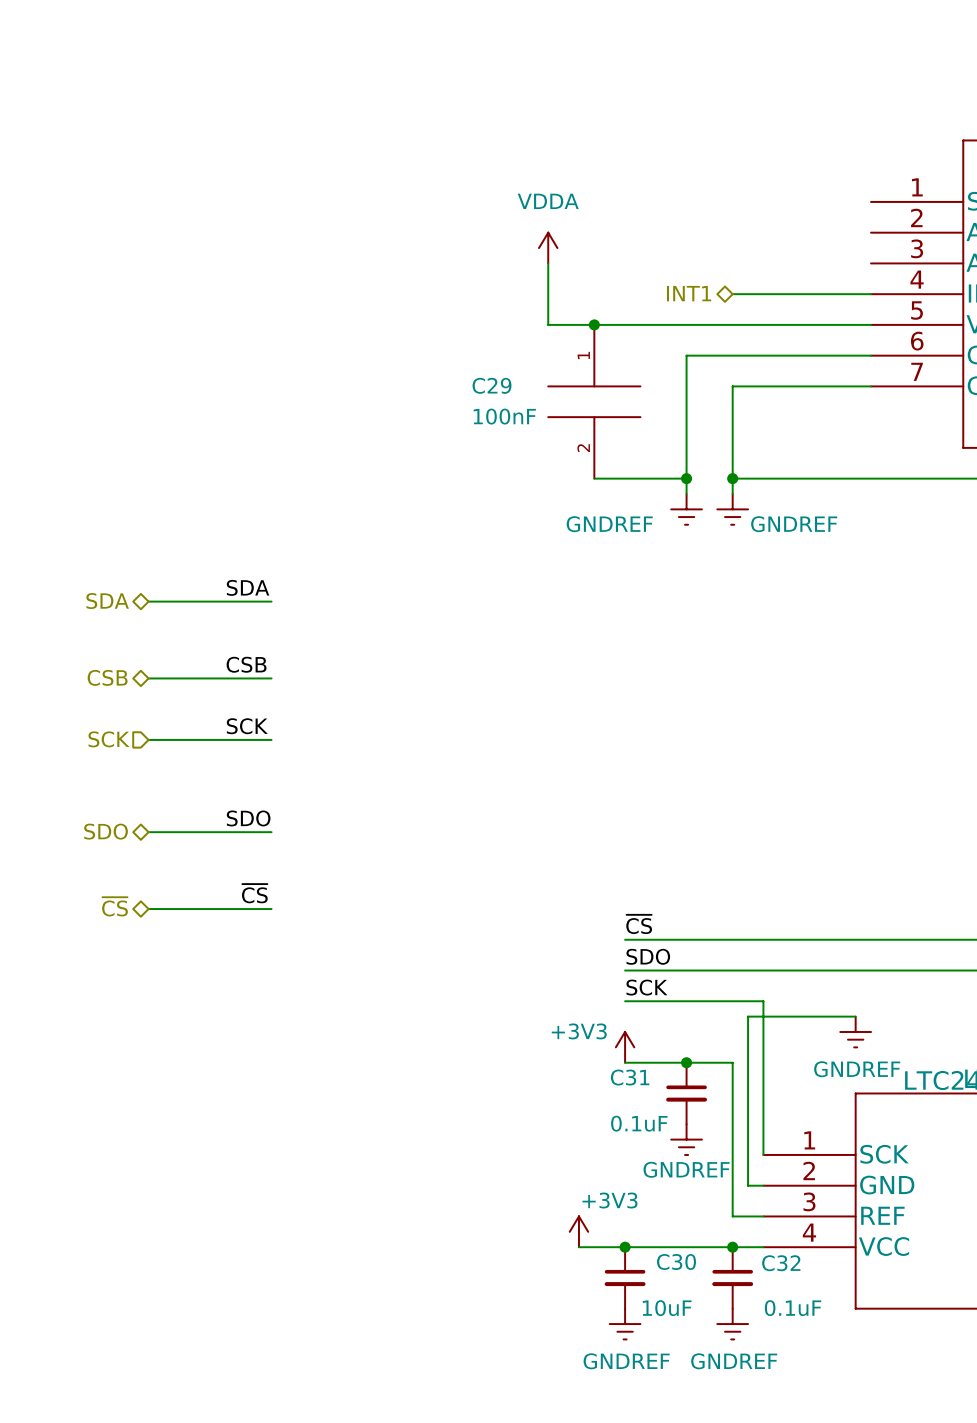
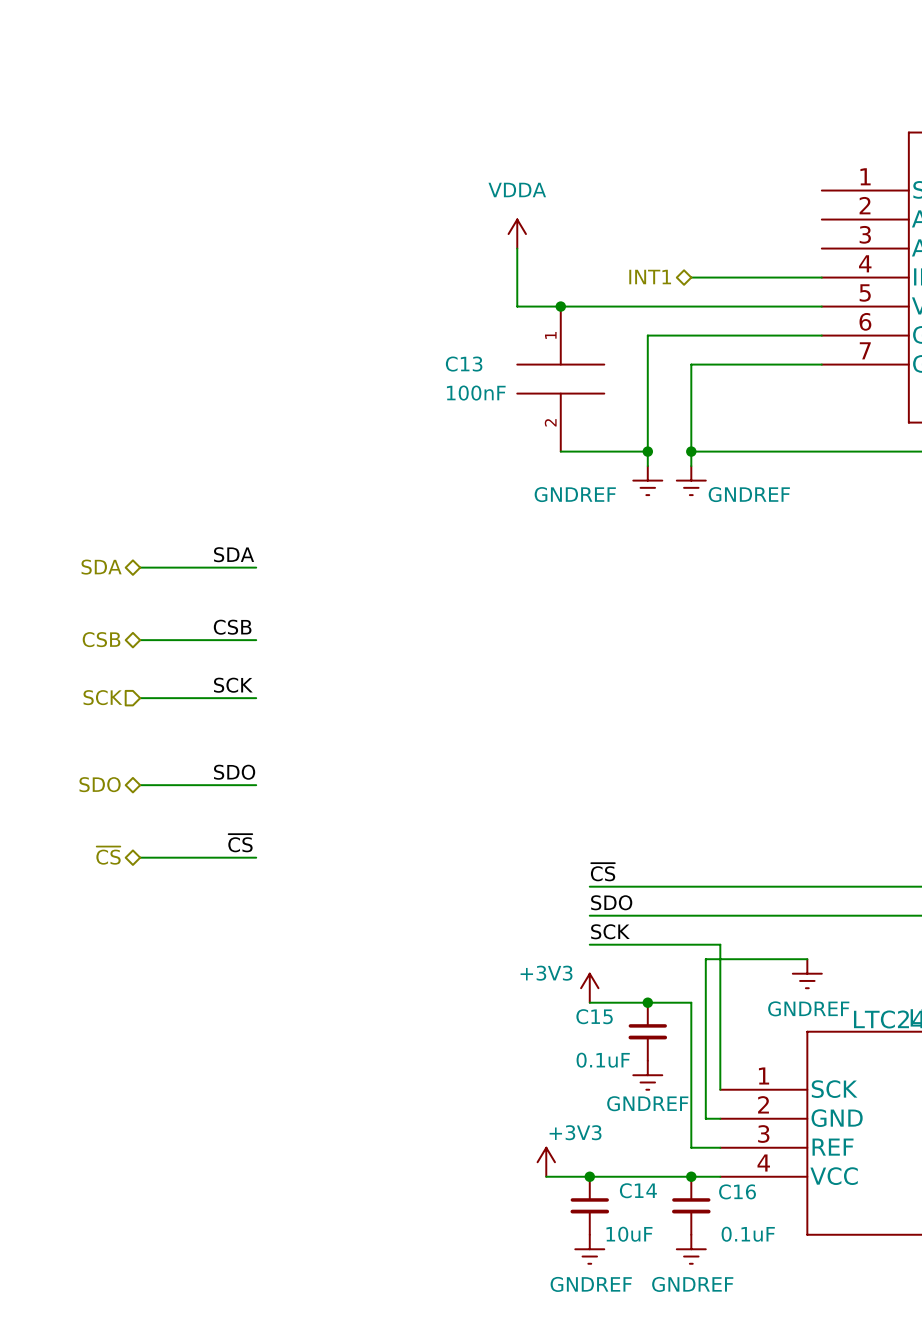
C29 name: C29 (492, 385) -> C13 (464, 364)
C31 name: C31 (630, 1077) -> C15 (594, 1016)
C30 name: C30 (676, 1262) -> C14 (638, 1190)
C32 name: C32 (781, 1263) -> C16 (737, 1191)

